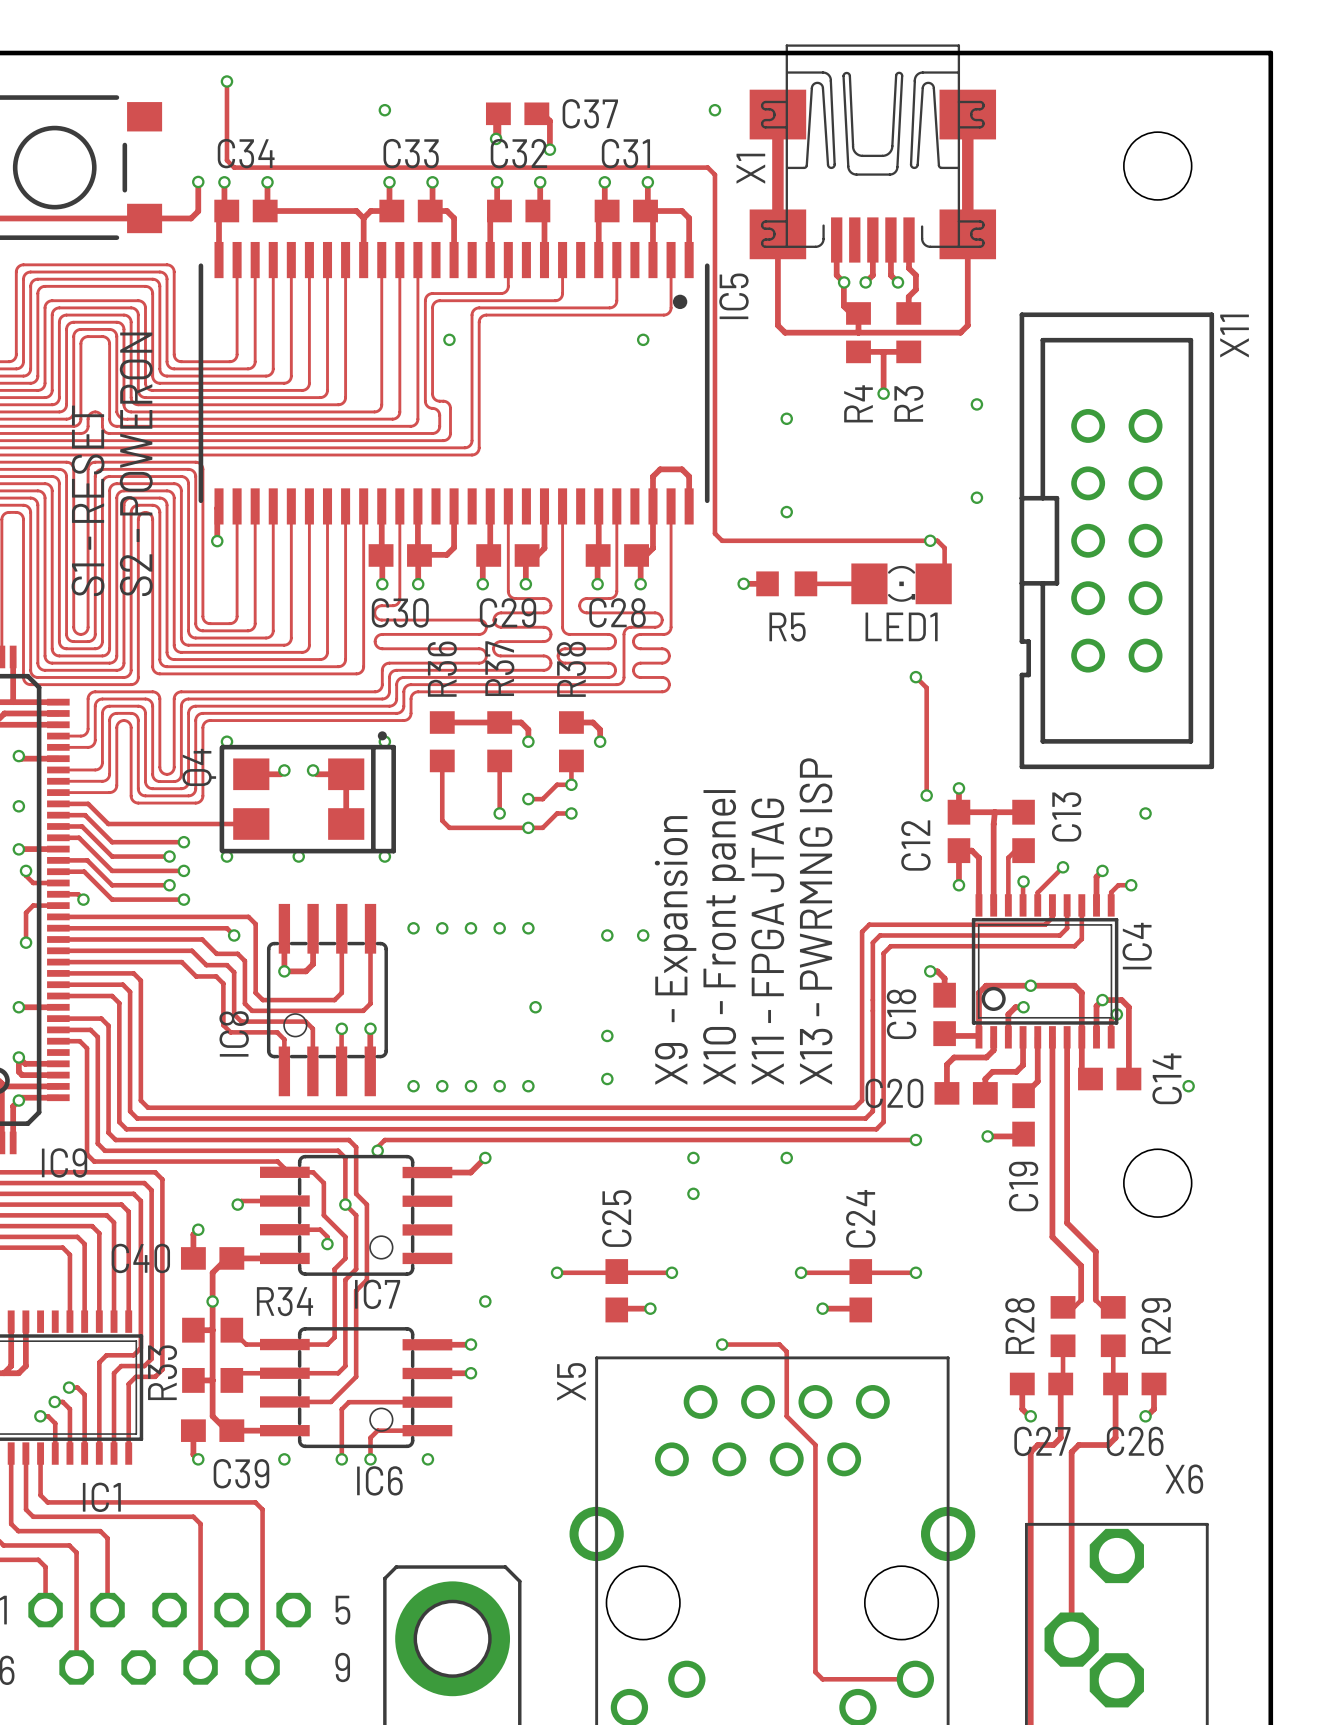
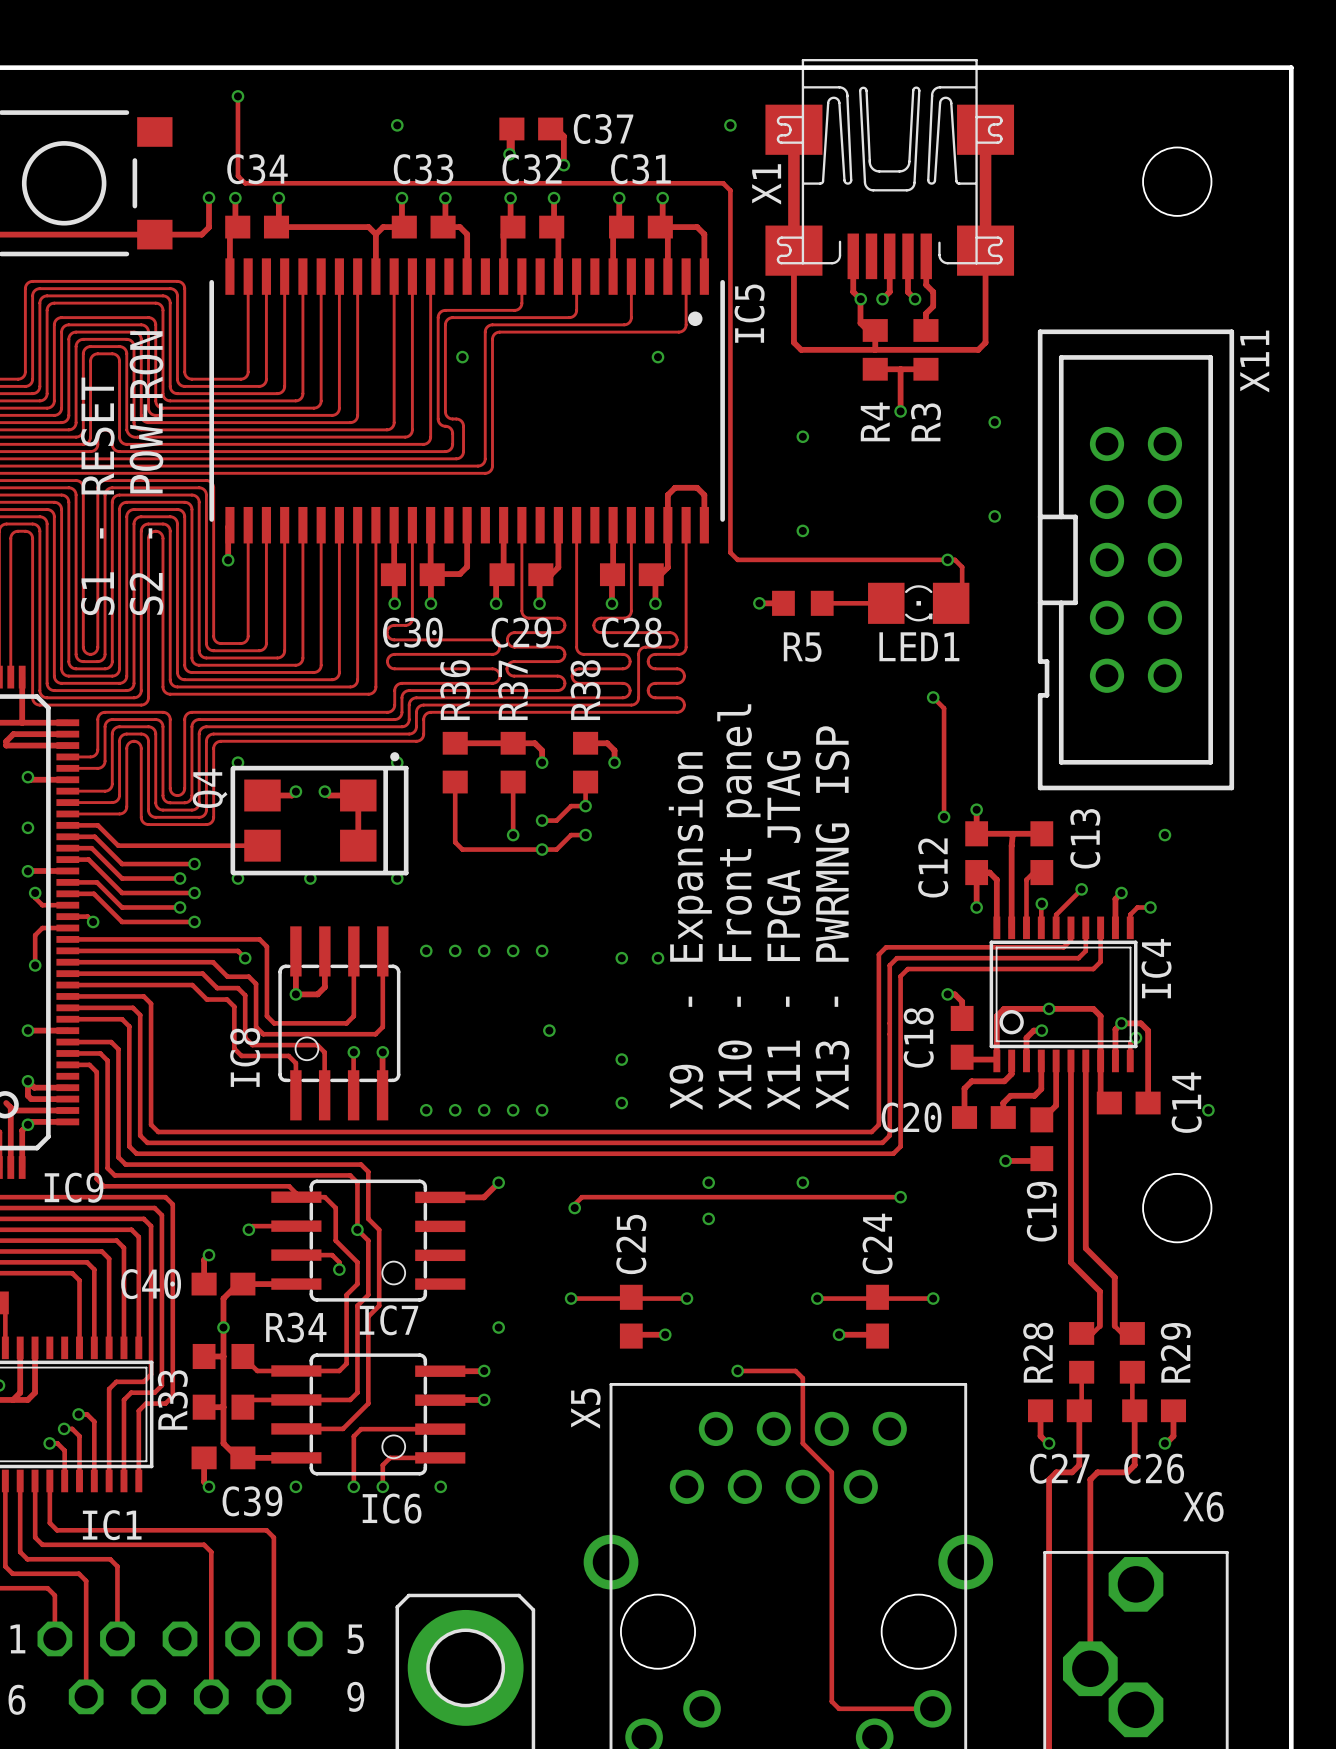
track: (915, 1140) (384, 1140) (377, 1147) (377, 1150) -> none
via position: (915, 1140) -> (900, 1197)
via: (377, 1150) -> none
track: none -> (900, 1197) (581, 1197) (574, 1204) (574, 1208)
via: none -> (574, 1208)

